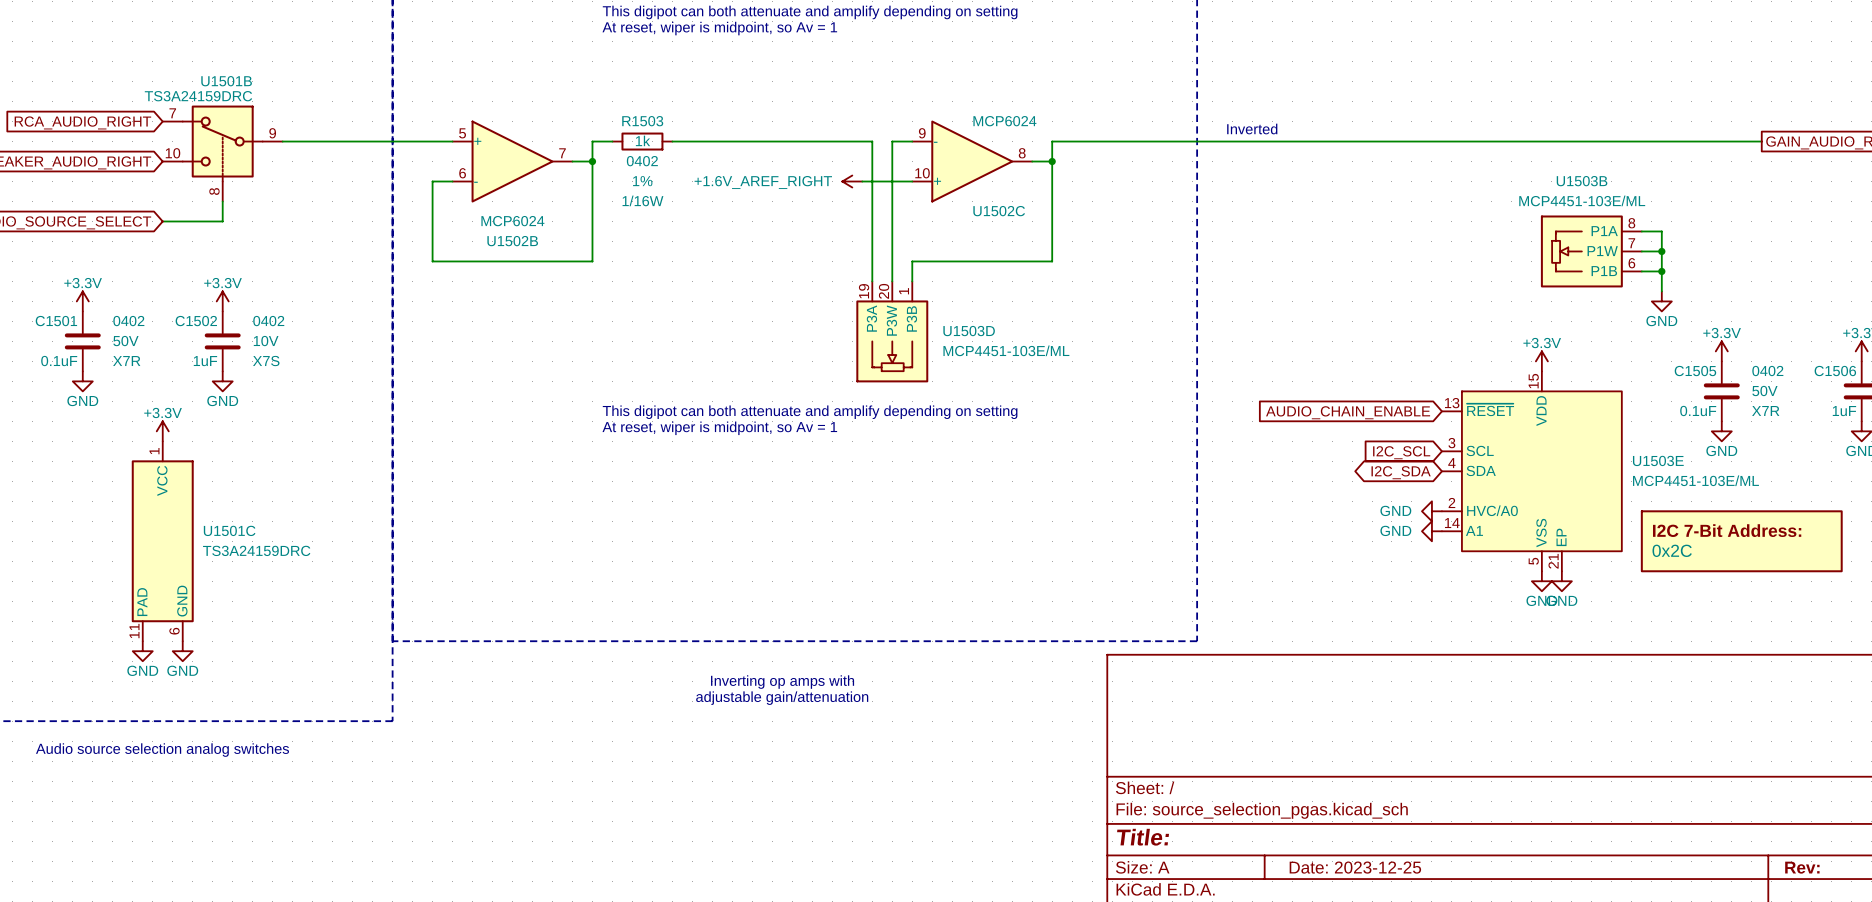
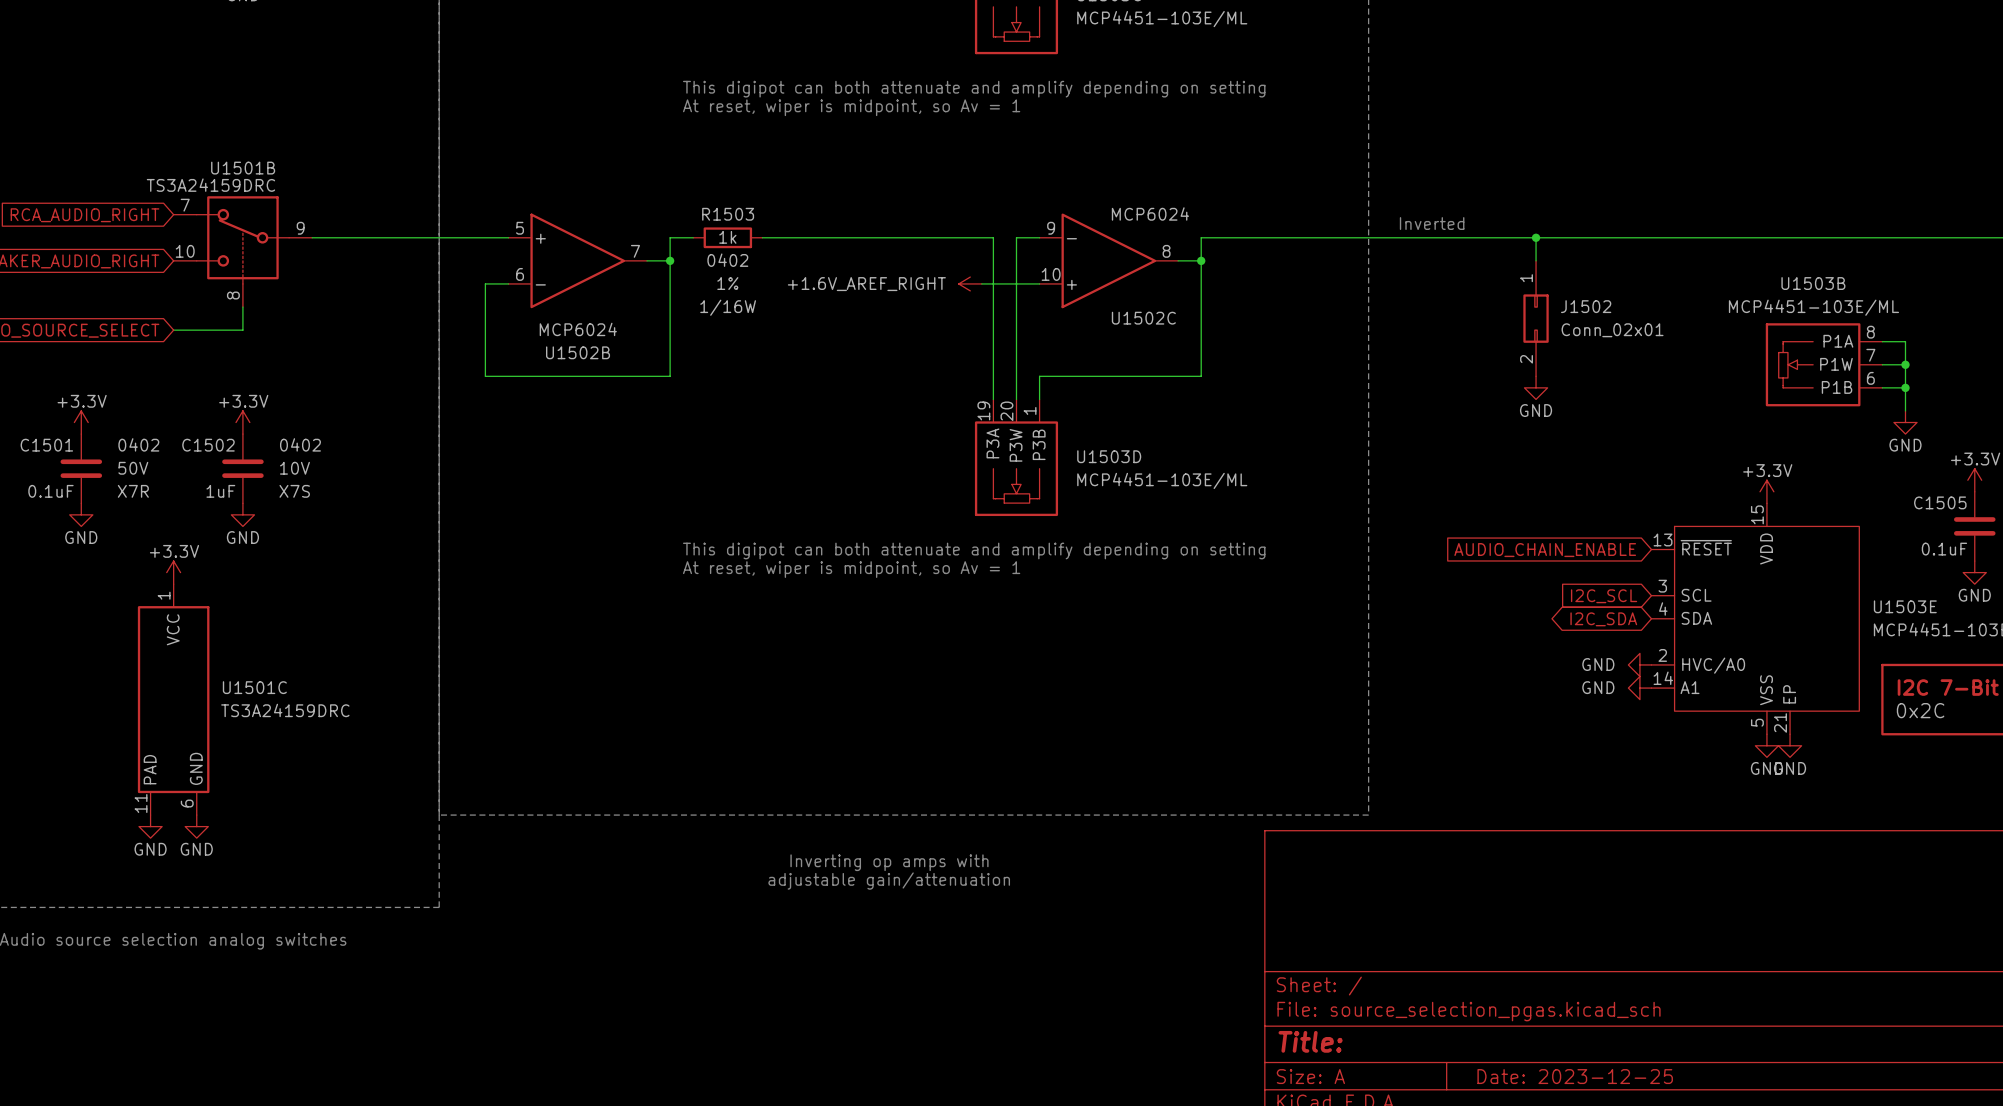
wire: none -> (1536, 237) (1536, 260)
junction: none -> (1536, 237)
J1502: none -> Conn_02x01 (1536, 318)
power symbol: none -> GND (1536, 387)

